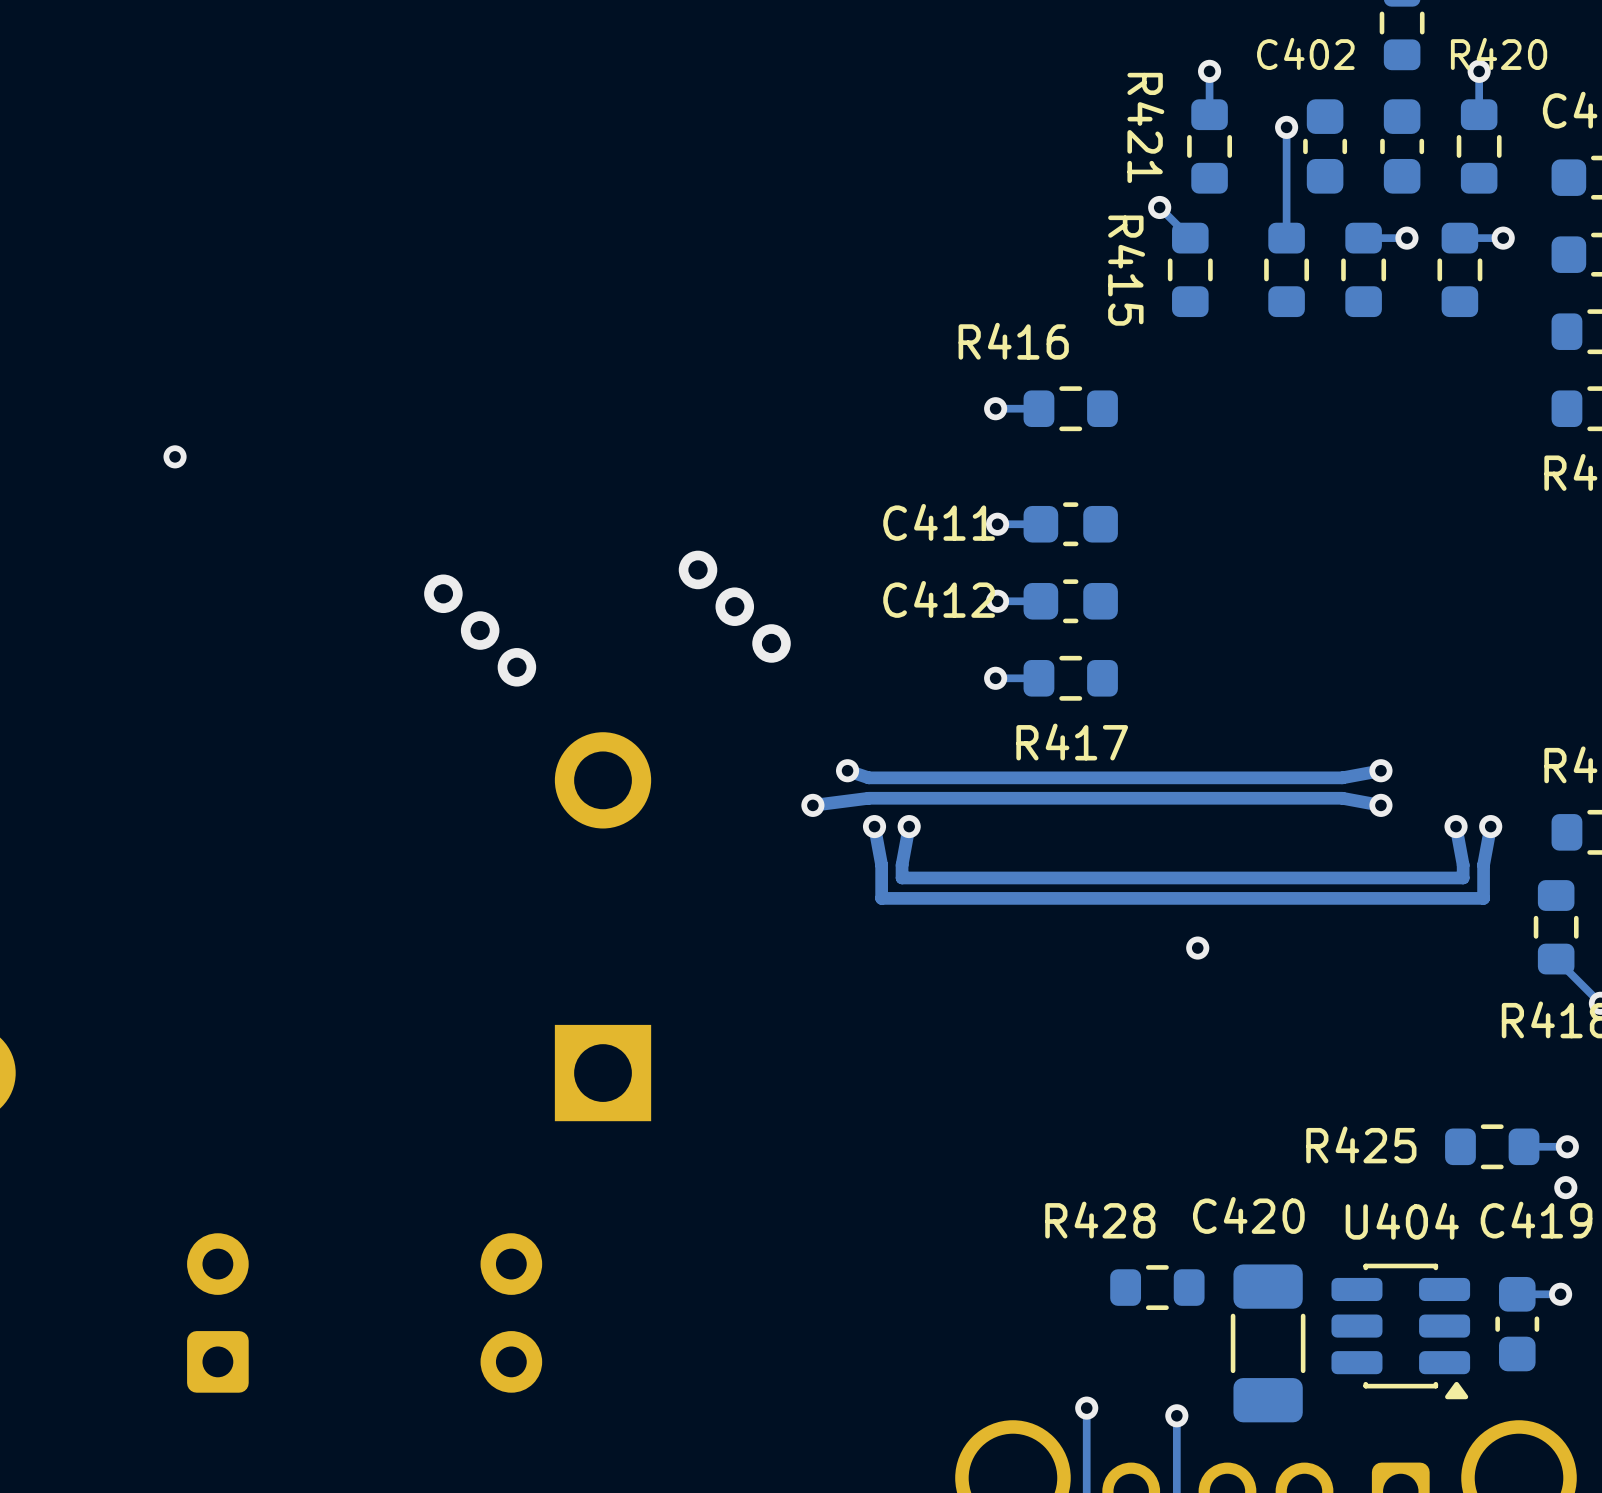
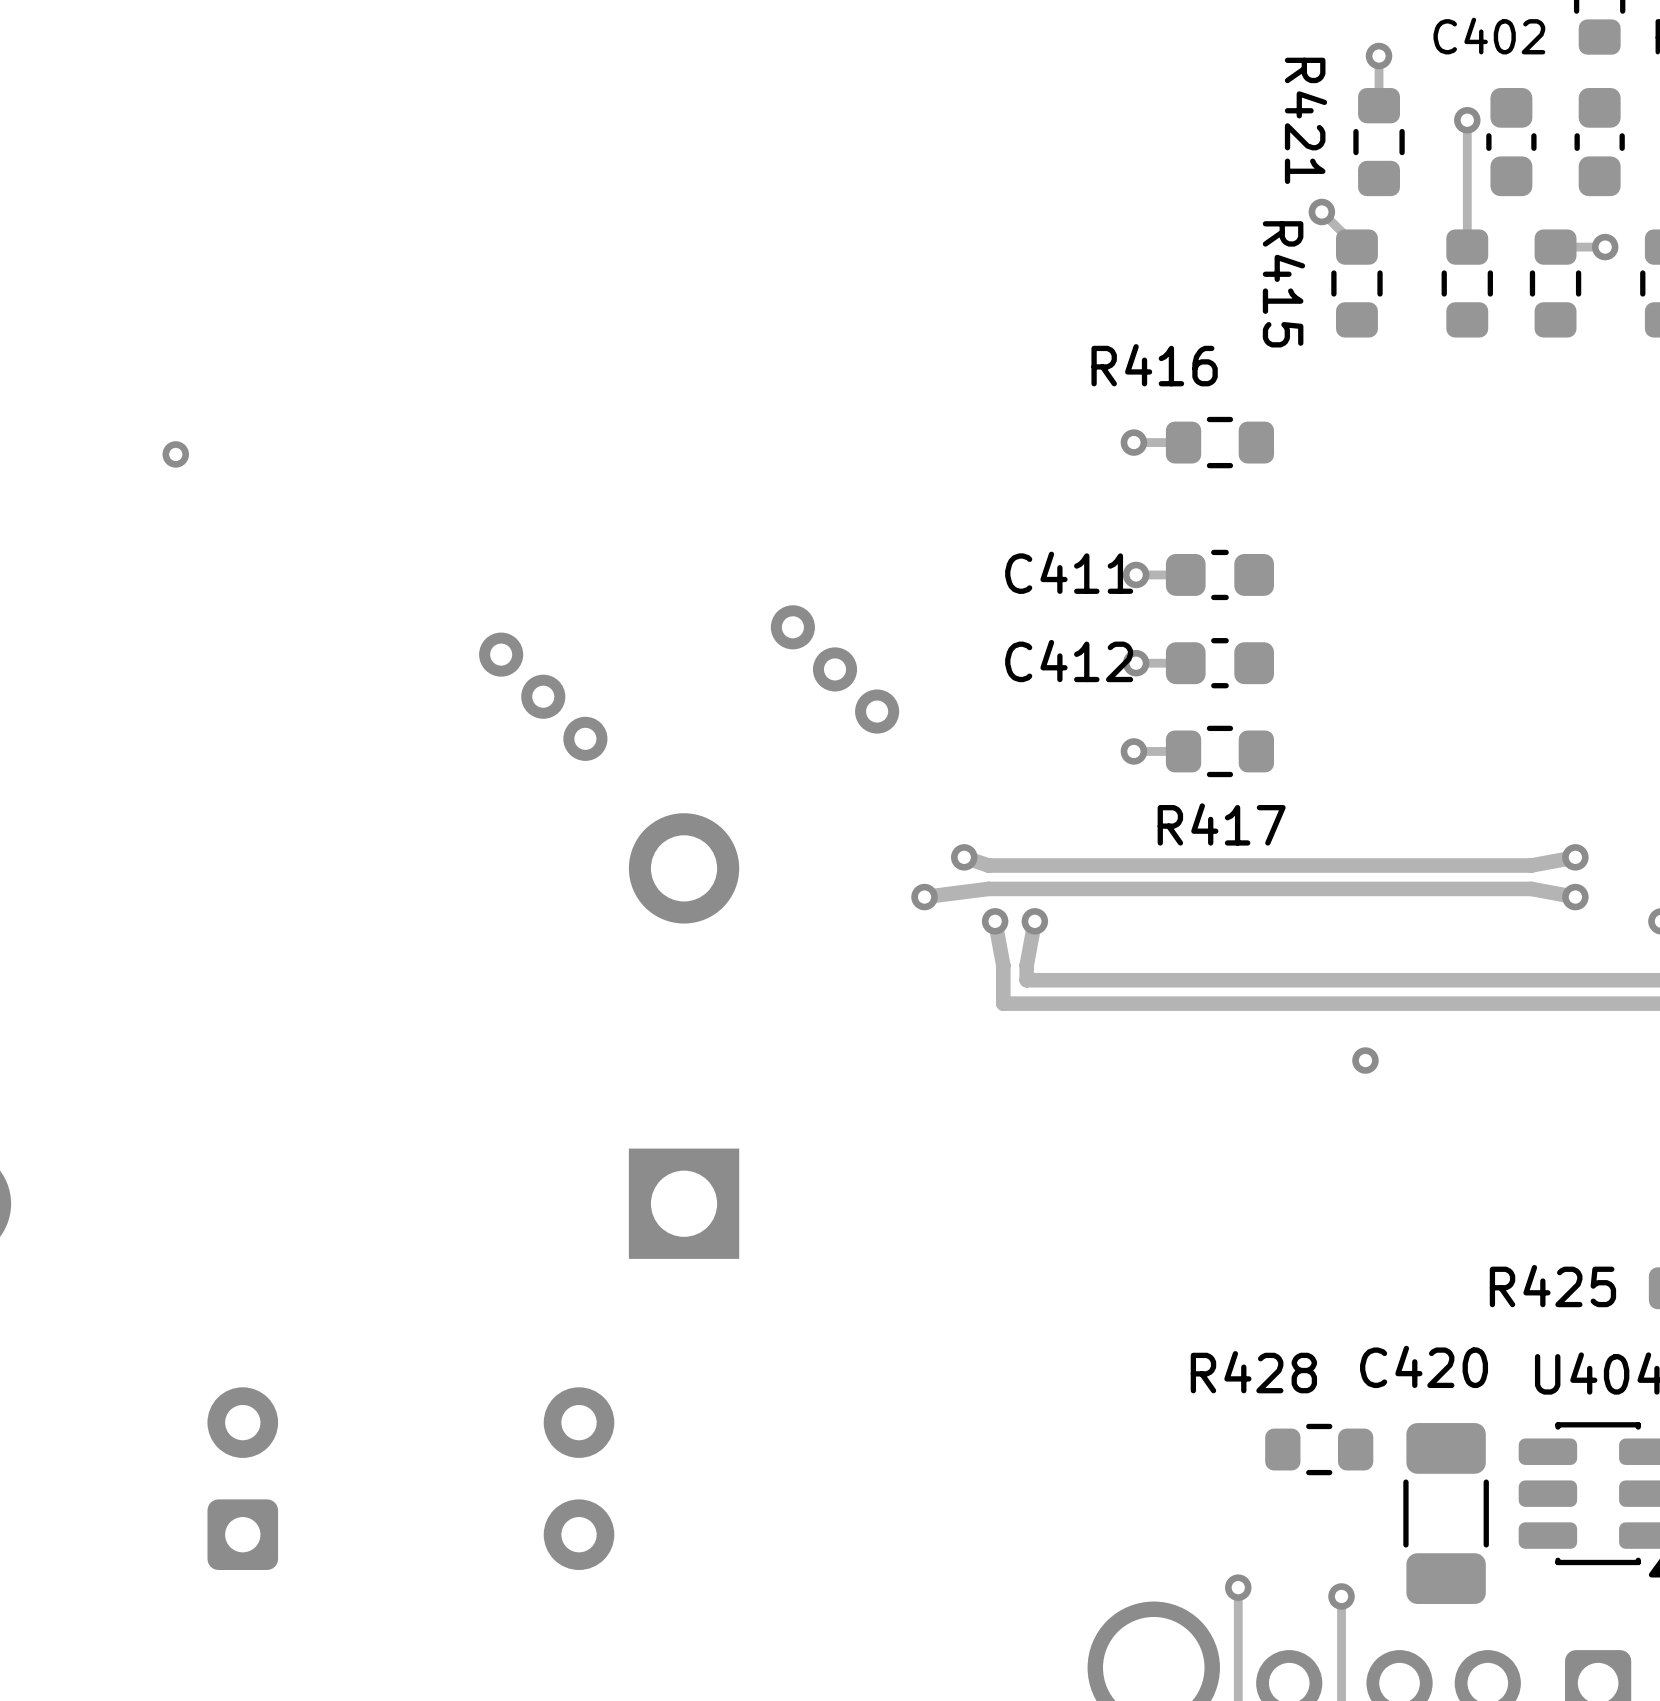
via position: (175, 456) -> (175, 454)

